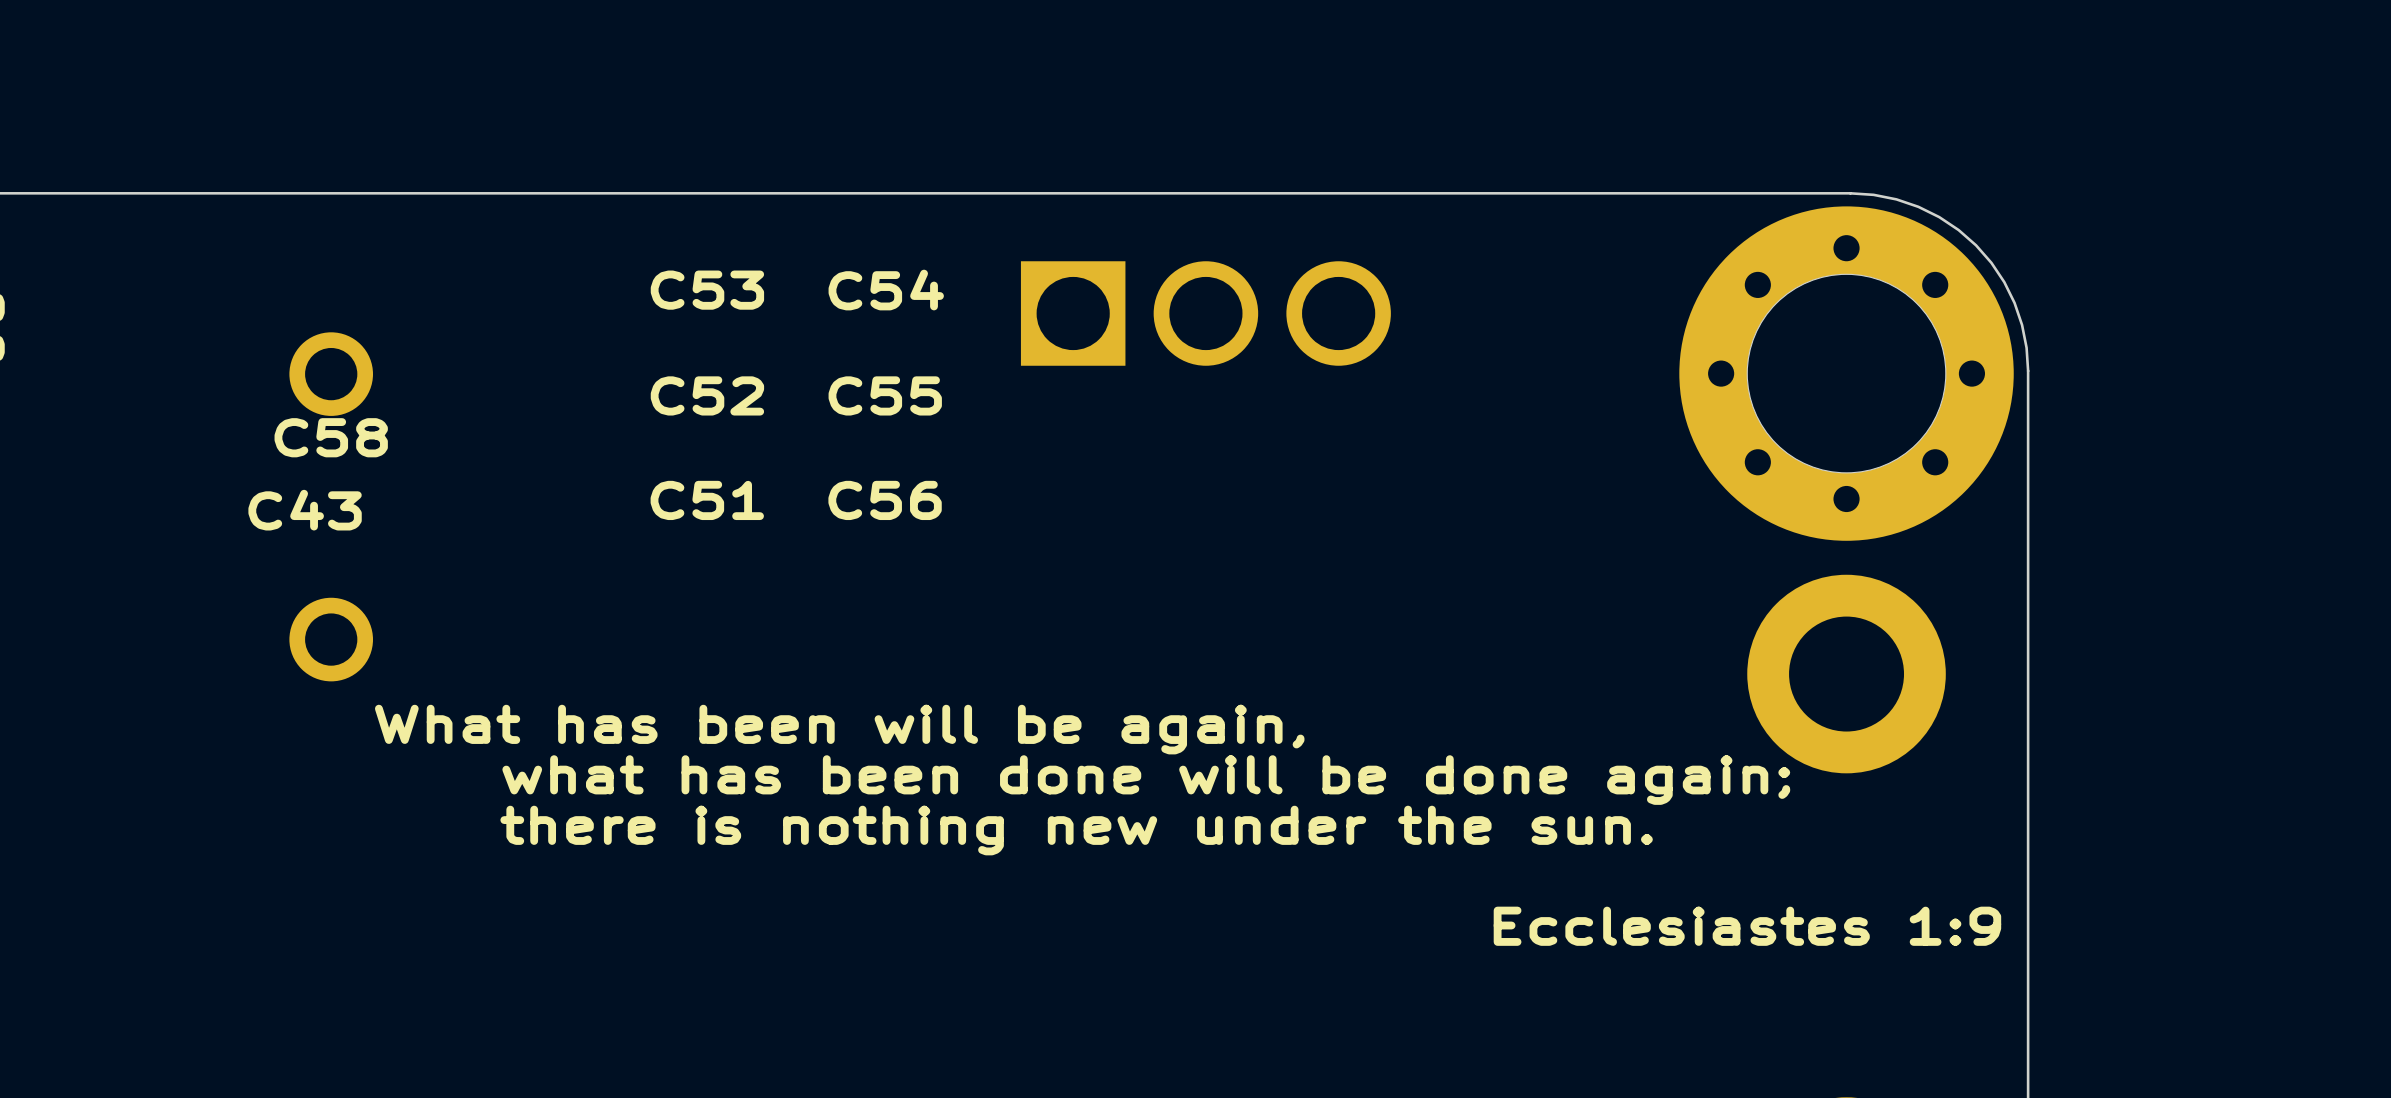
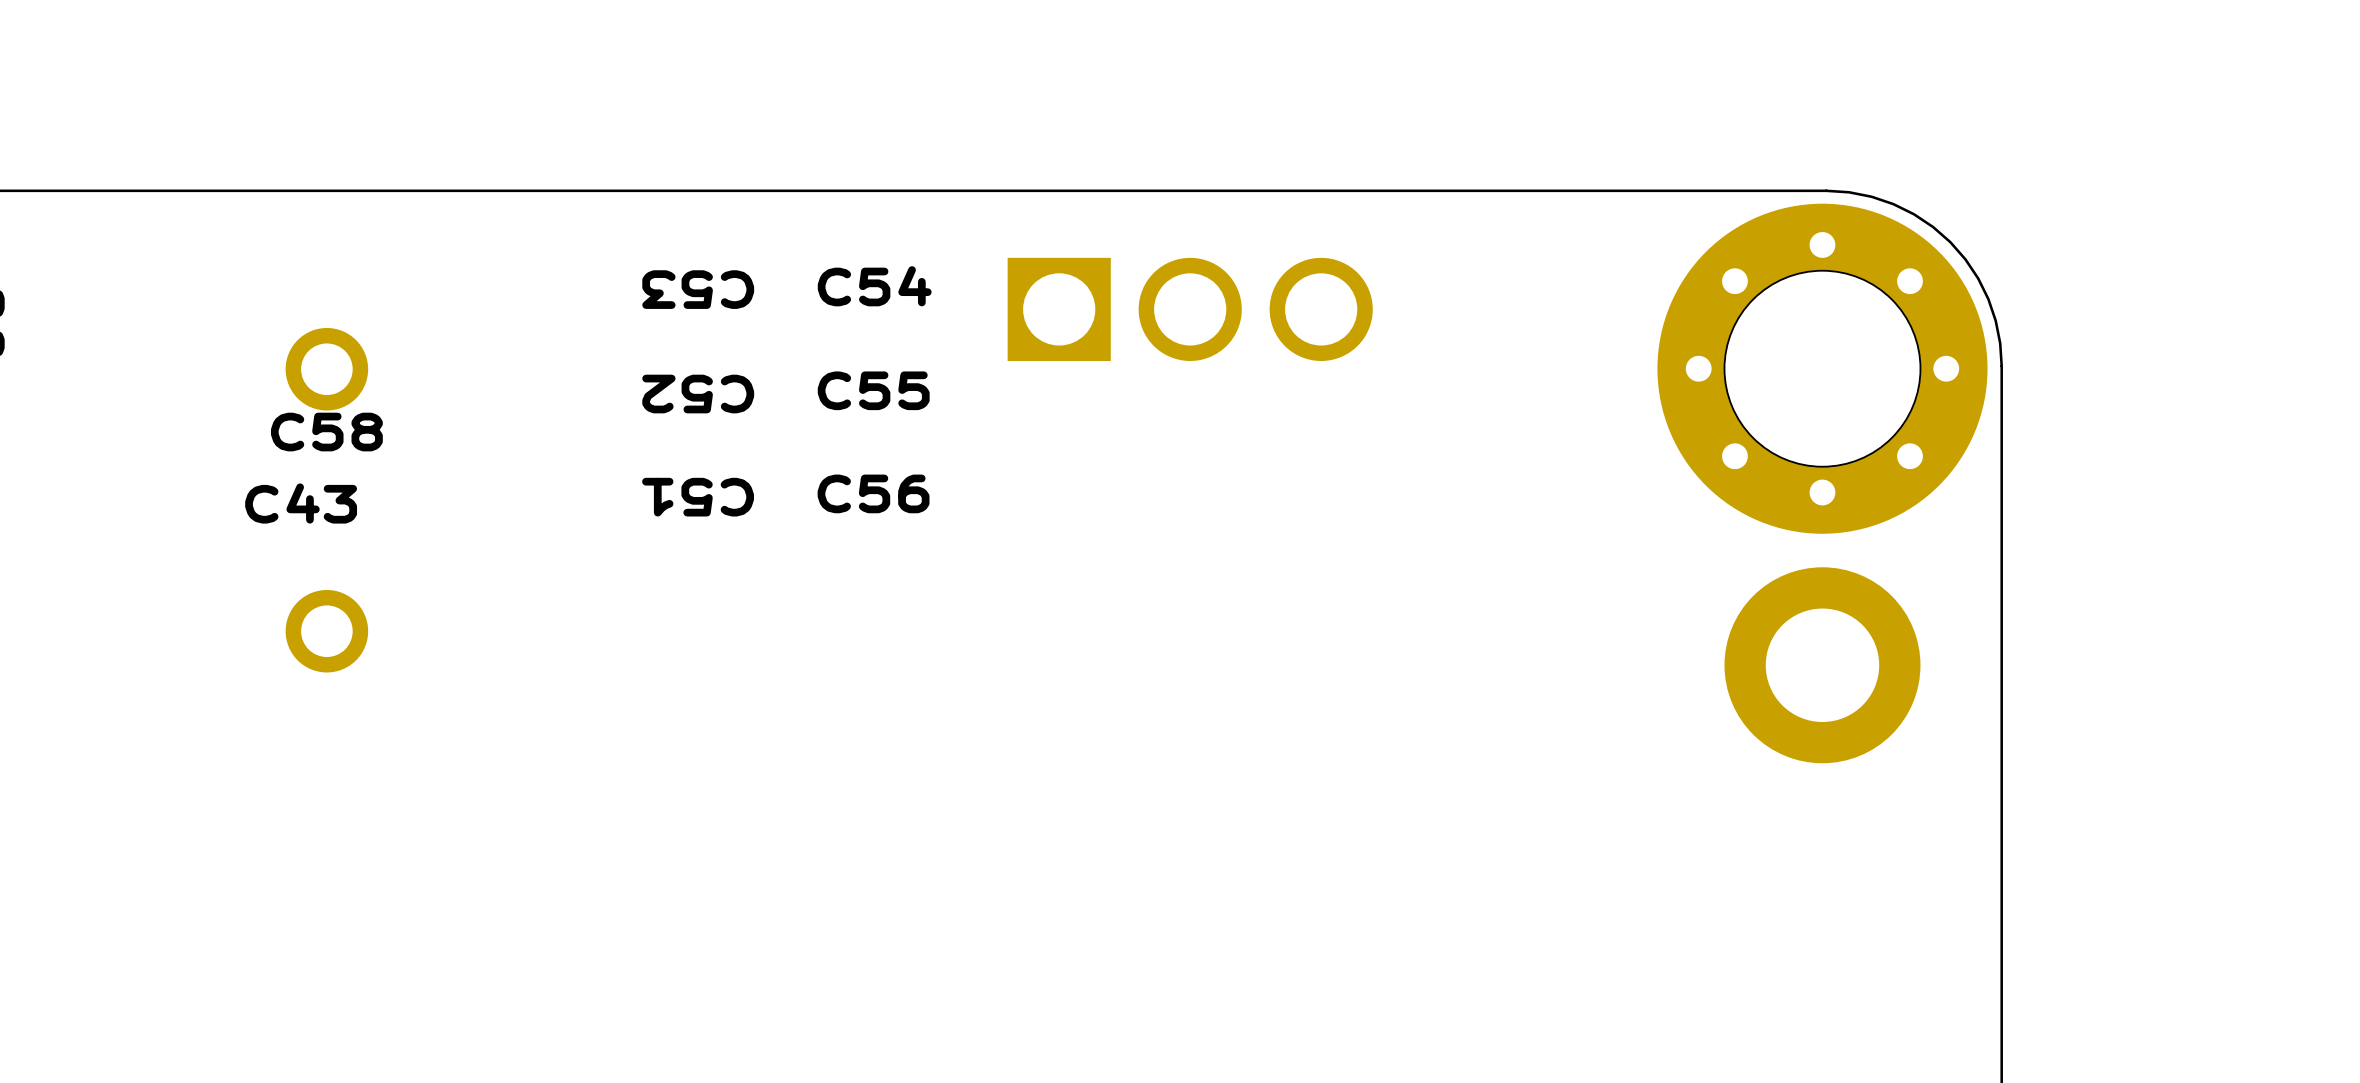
C53 name rotation: 0° (707, 290) -> 180° (698, 289)
C52 name rotation: 0° (707, 395) -> 180° (698, 394)
C51 name rotation: 0° (707, 500) -> 180° (698, 497)
text: What has been will be again, (839, 729) -> none
text: what has been done will be done again; (1146, 780) -> none
text: there is nothing new under the sun. (1076, 830) -> none
text: Ecclesiastes 1:9 (1747, 926) -> none

